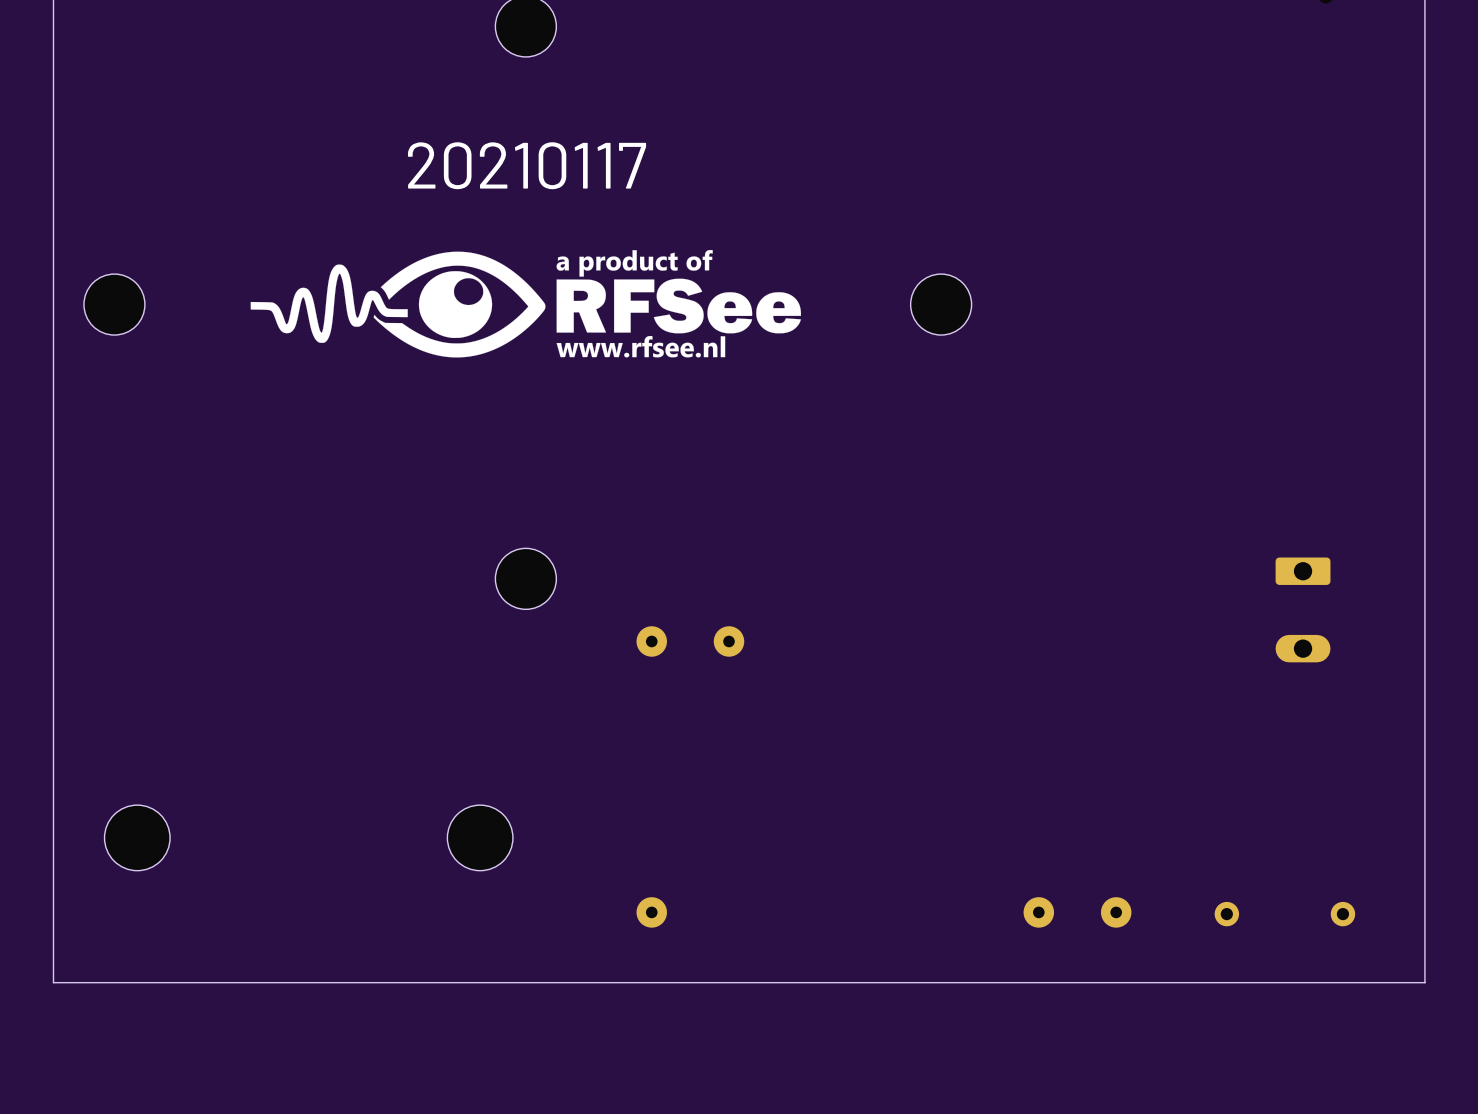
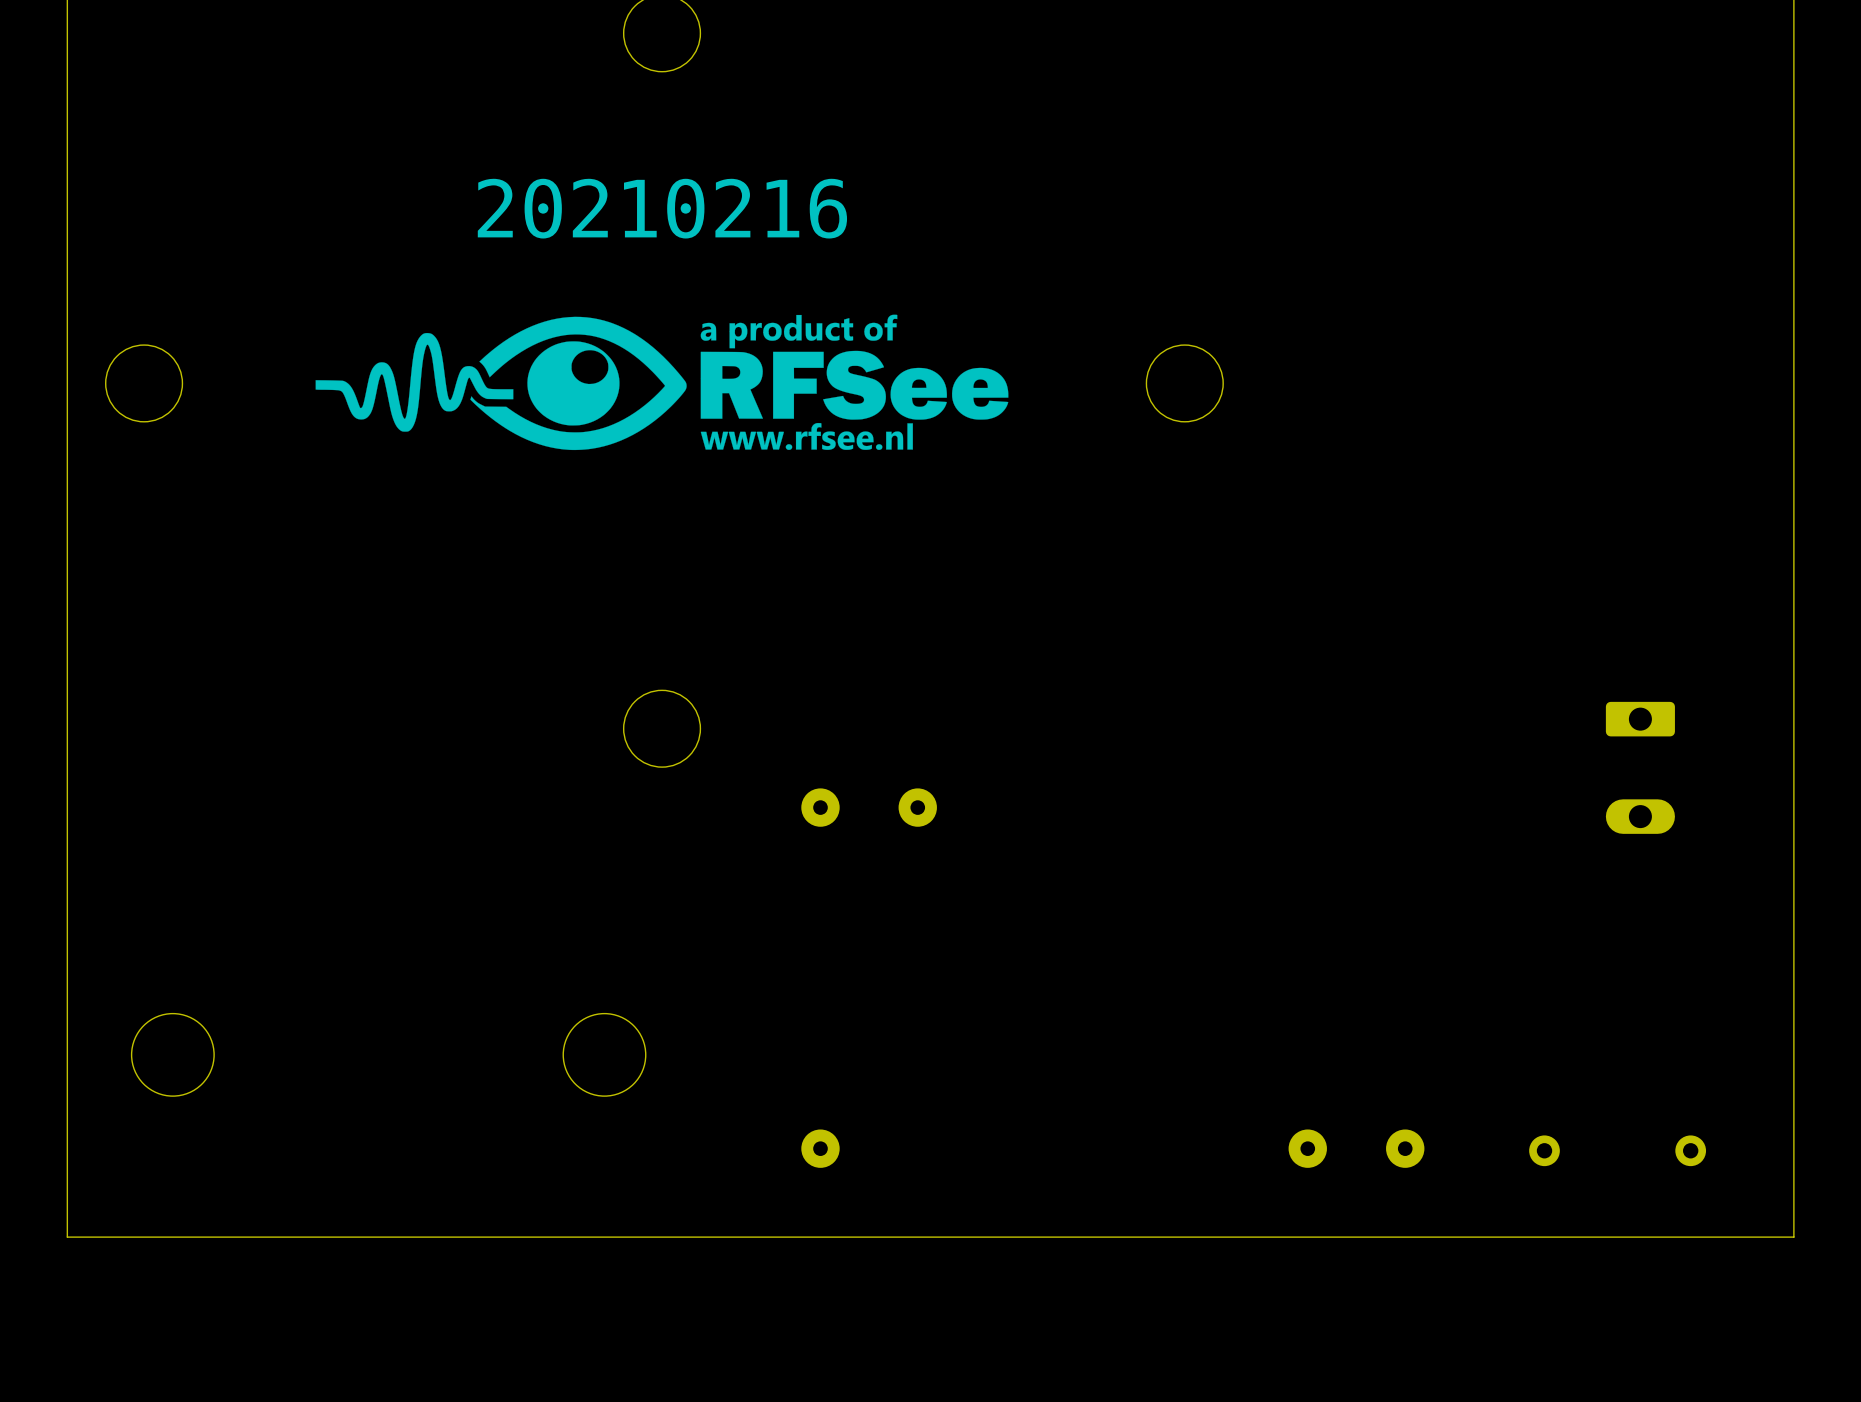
text: 20210117 (527, 165) -> 20210216 (662, 208)

